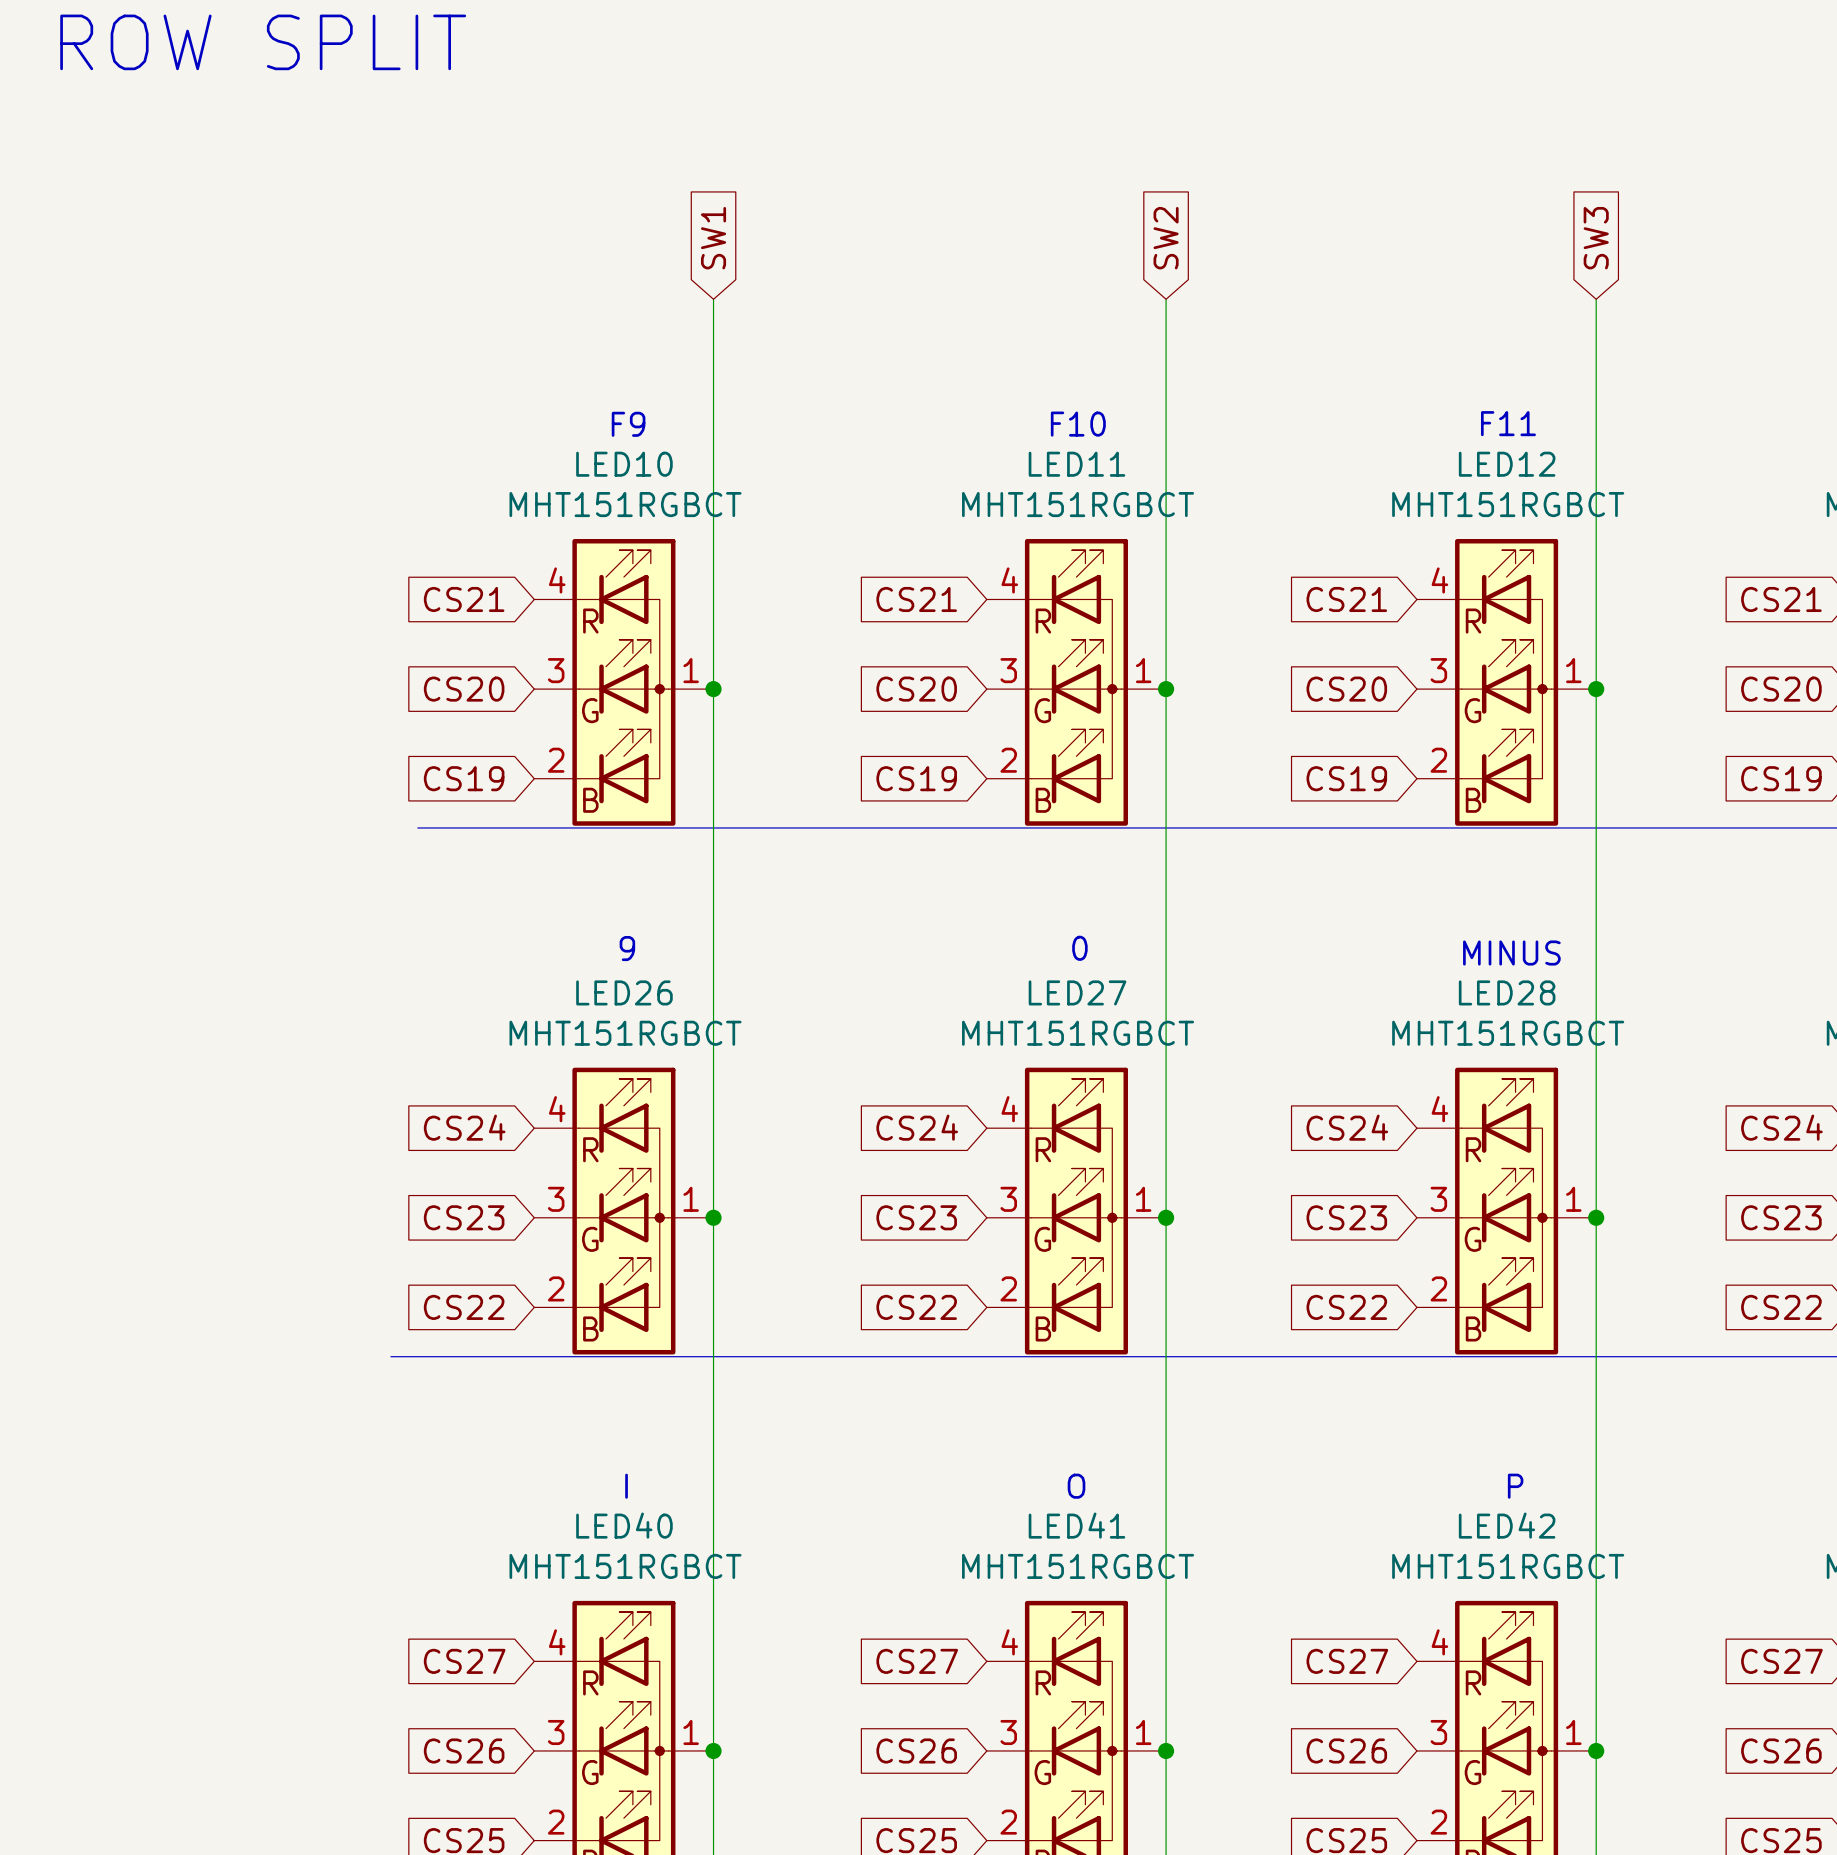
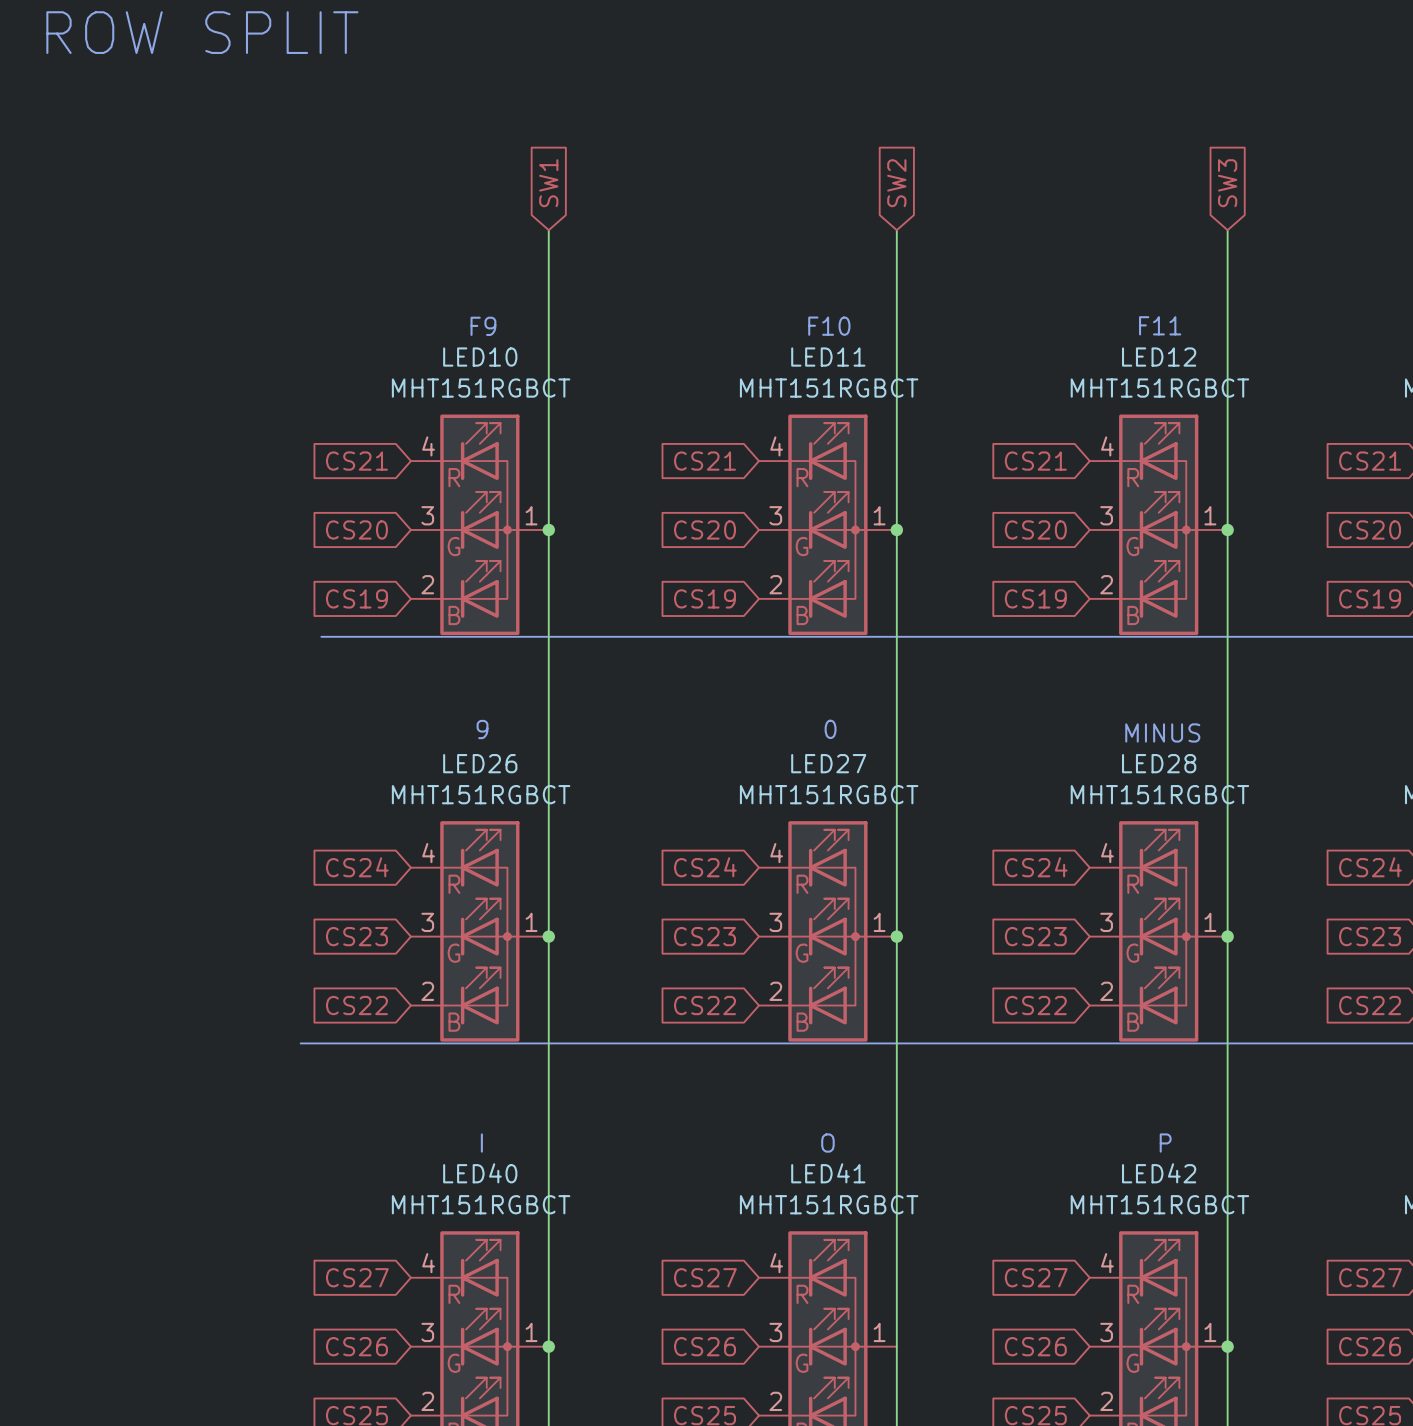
junction: (1166, 1750) -> none

